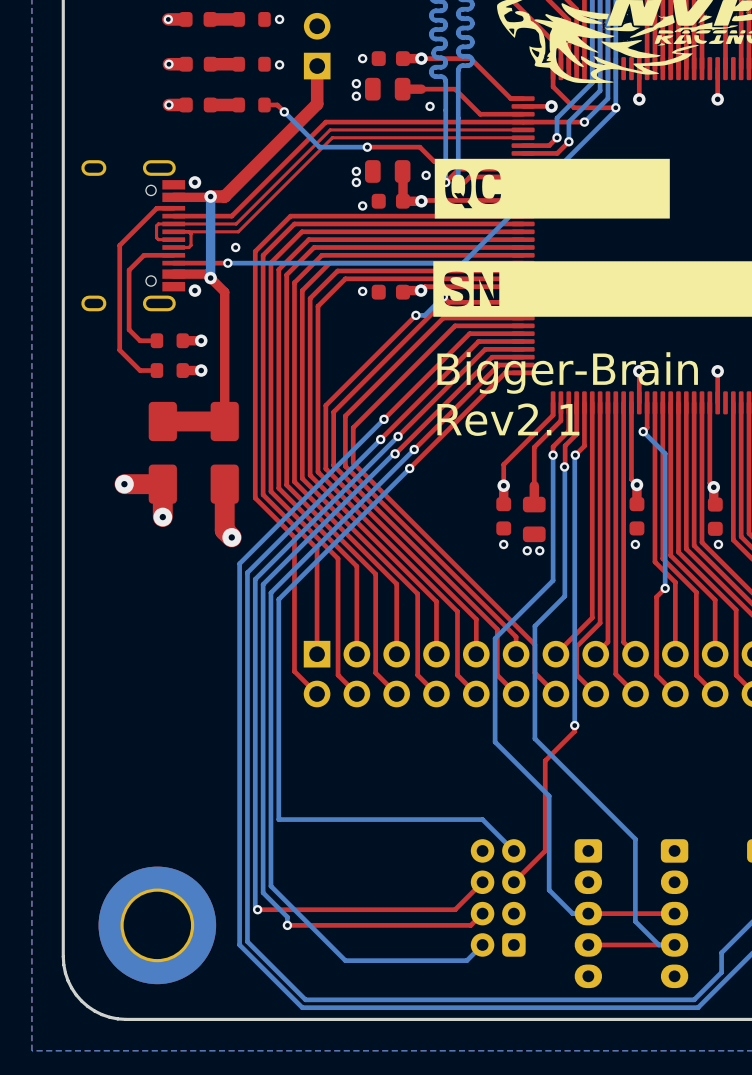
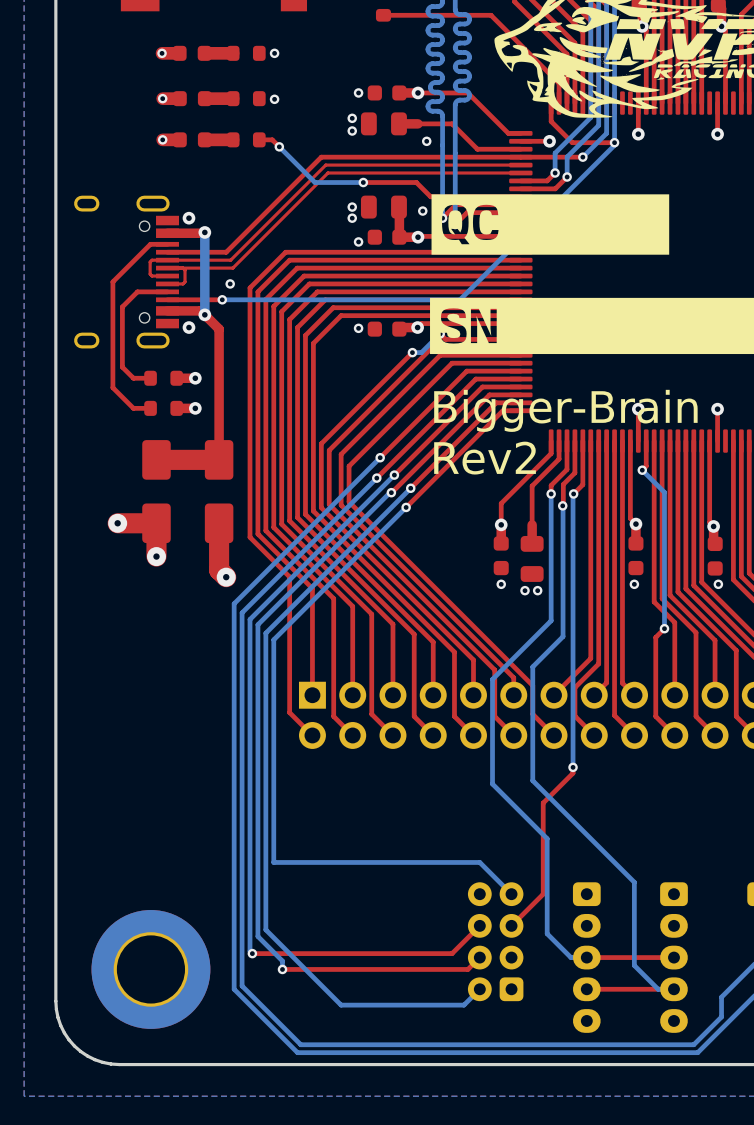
part: (317, 46) -> none
top track: (317, 66) (317, 104) (224, 196) (210, 196) -> none
text: Rev2.1 (508, 419) -> Rev2 (485, 458)

